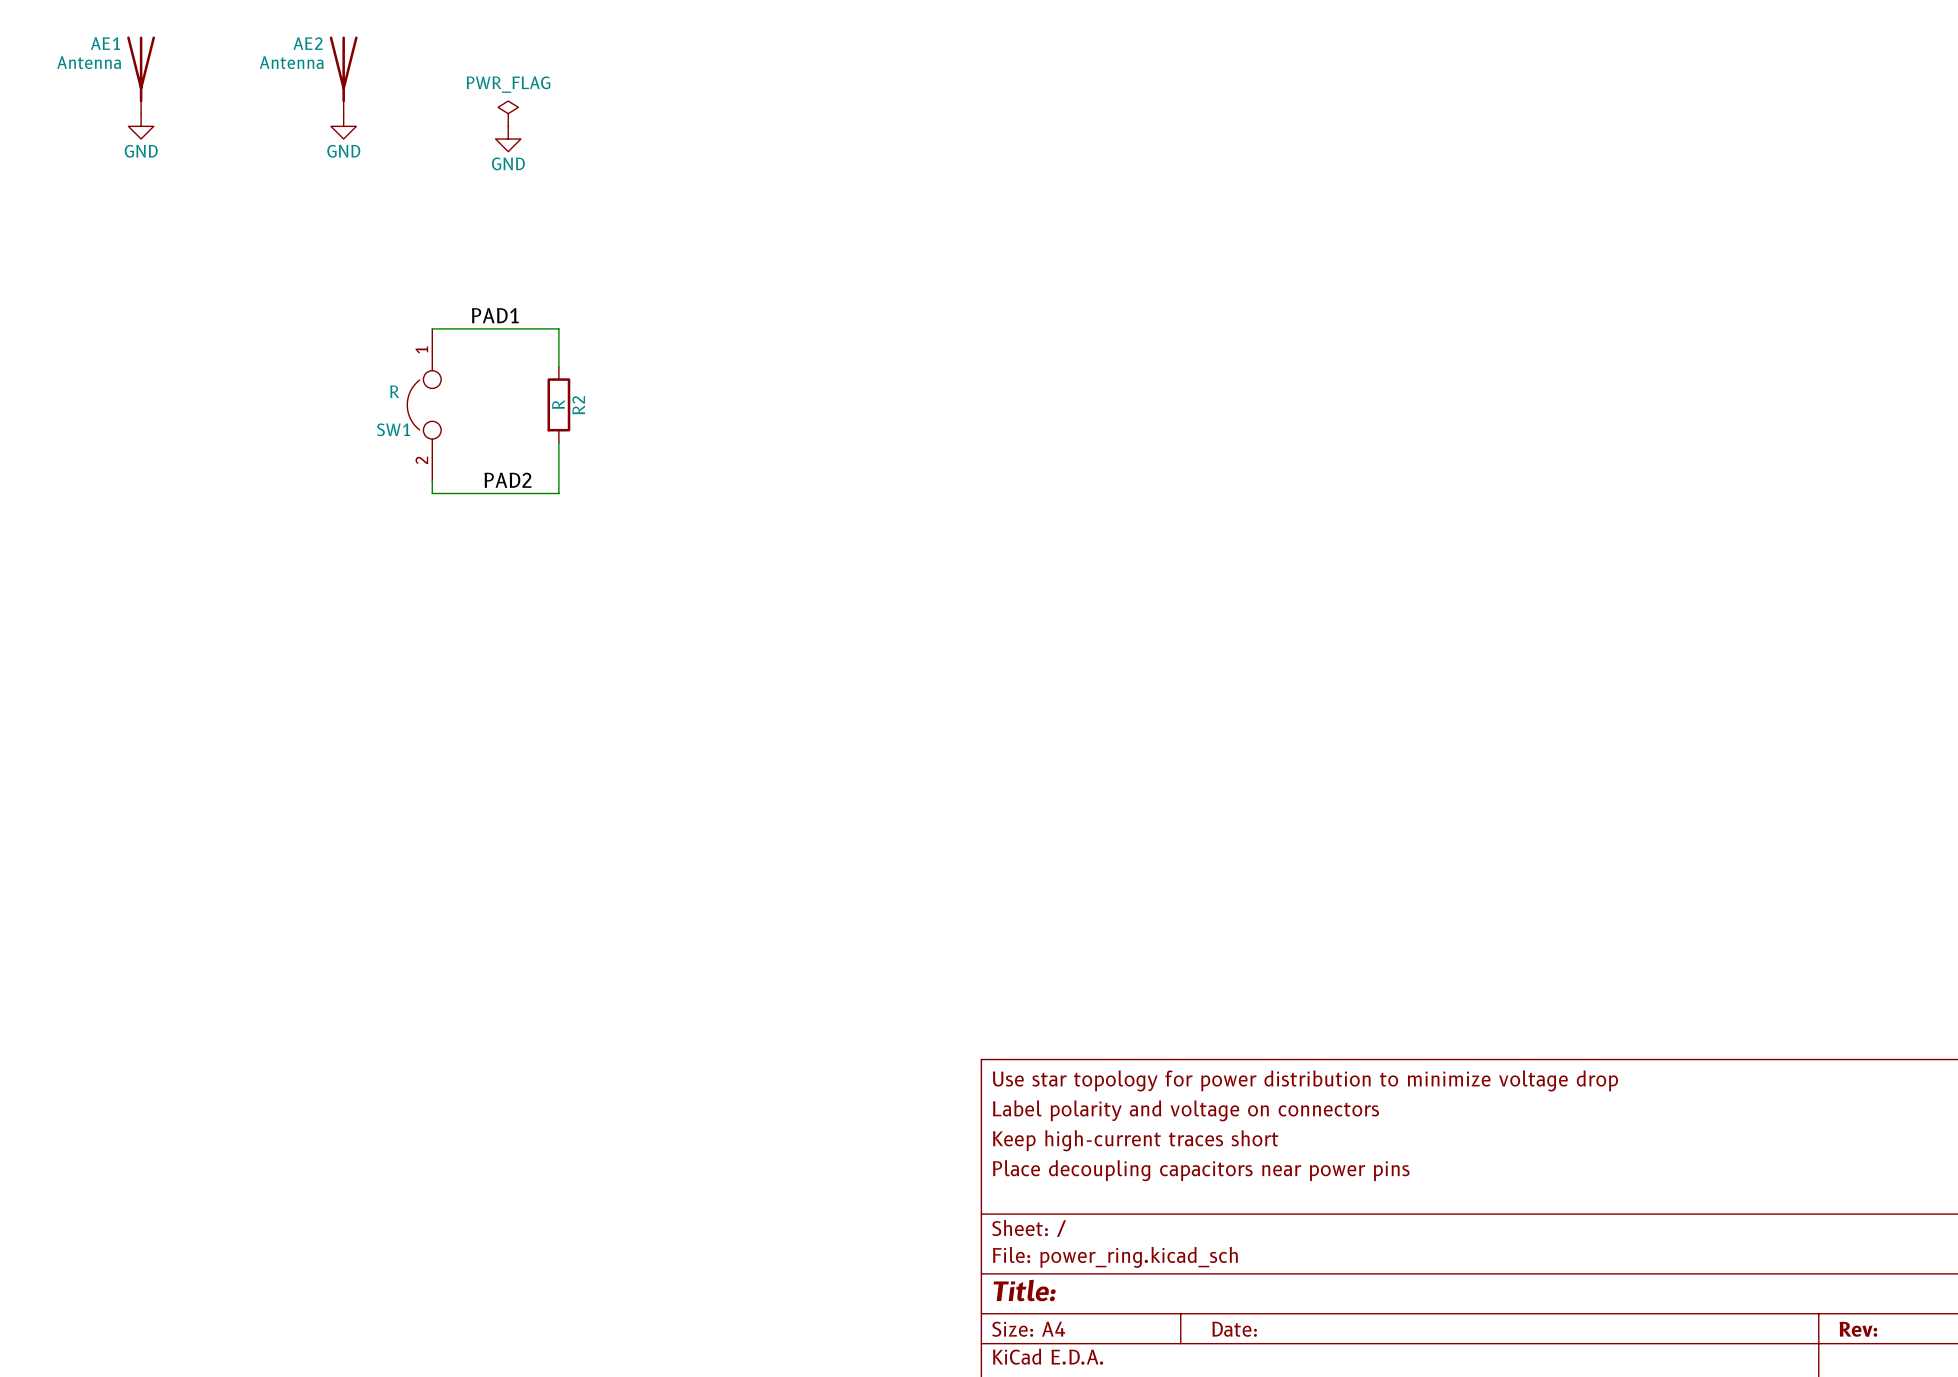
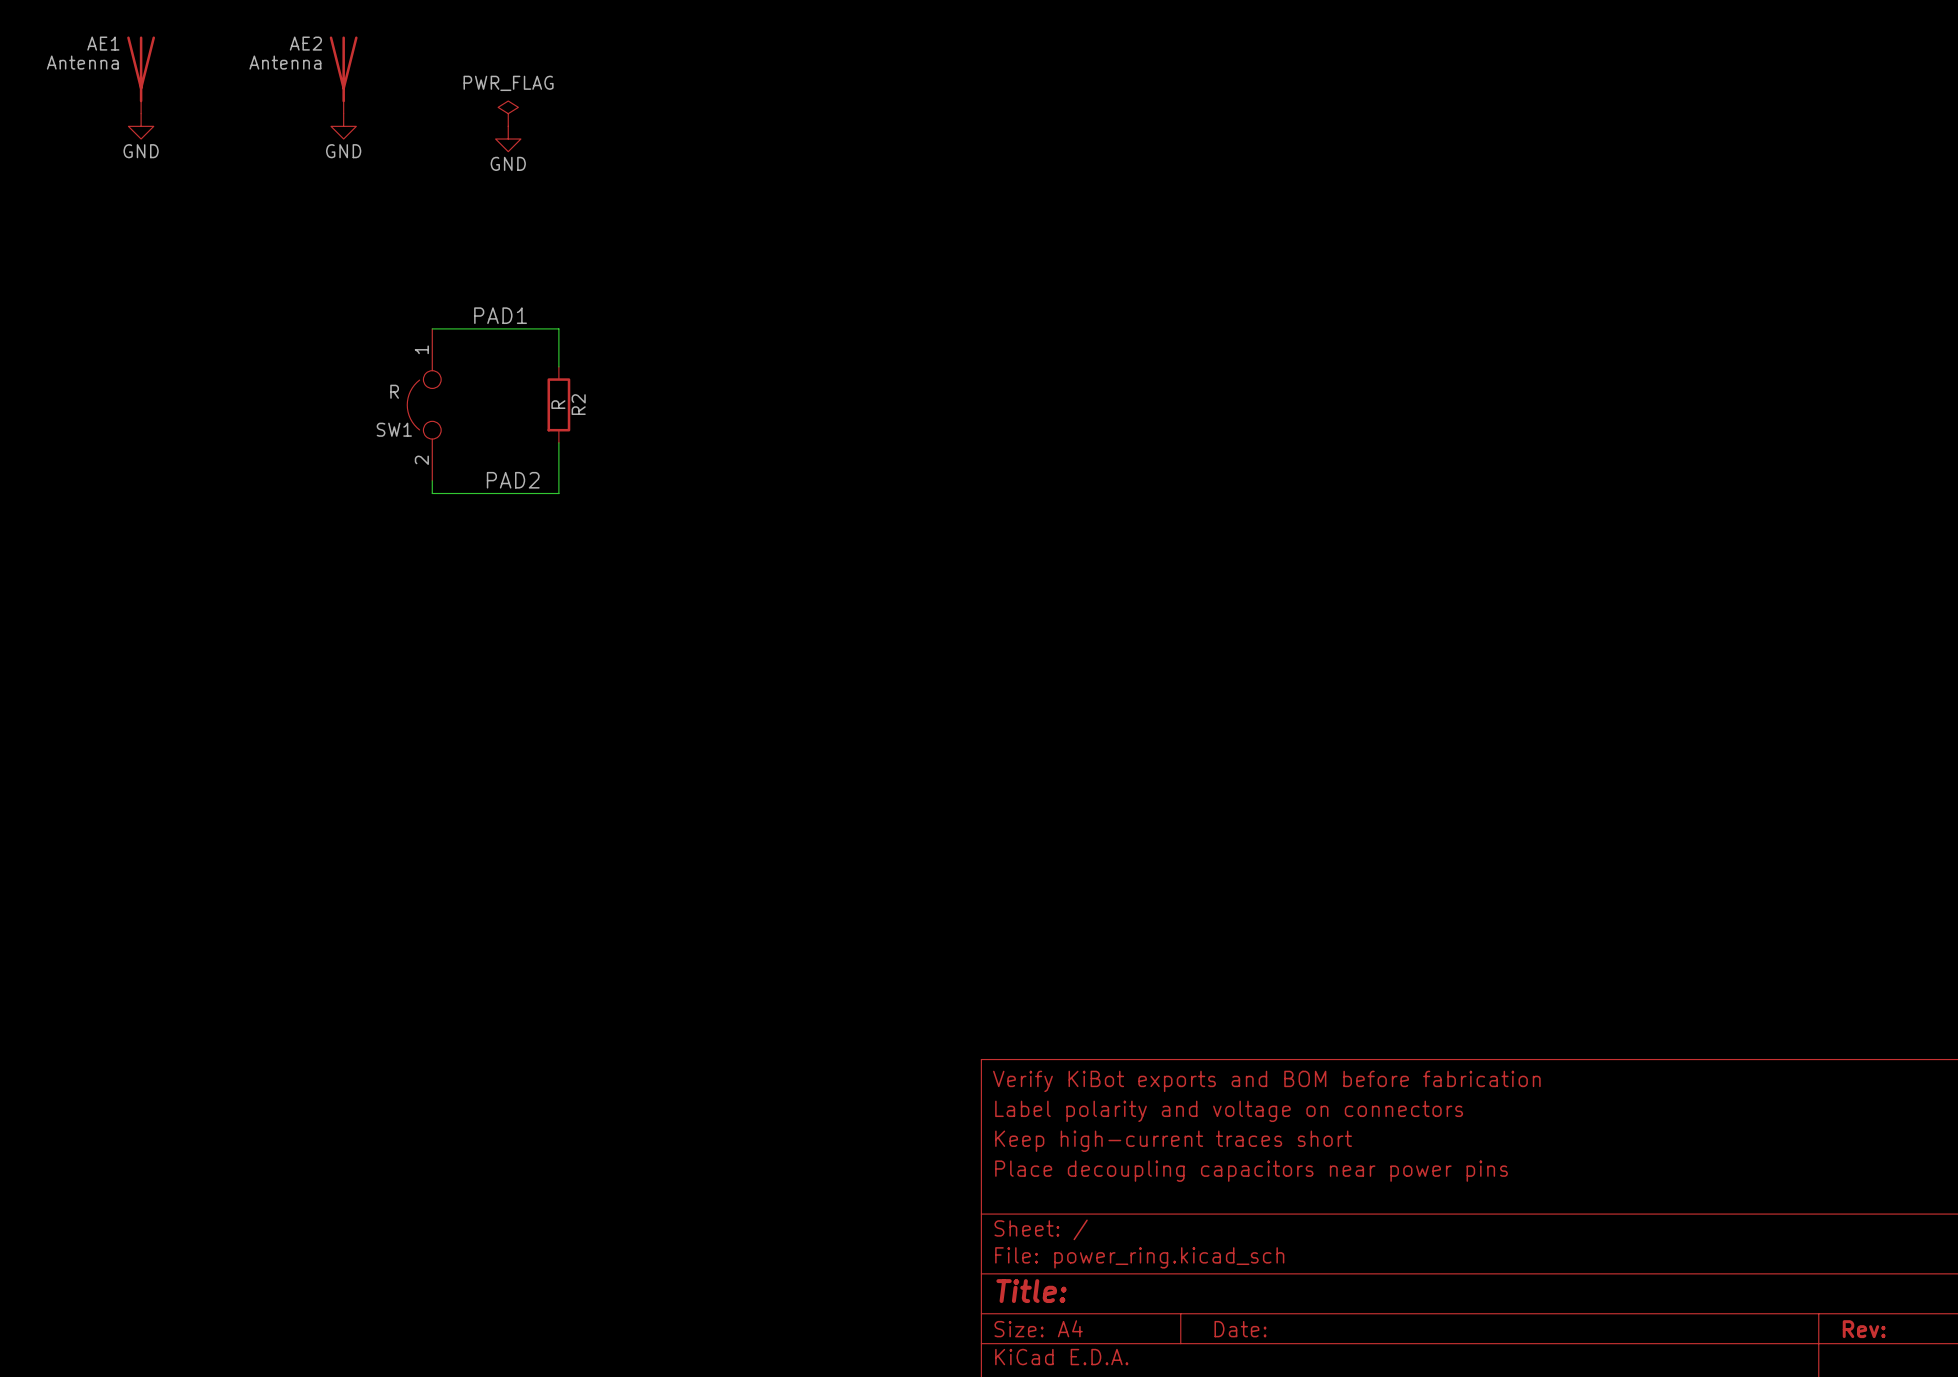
title block: Use star topology for power distribution to minimize voltage drop (1305, 1080) -> Verify KiBot exports and BOM before fabrication (1266, 1081)

